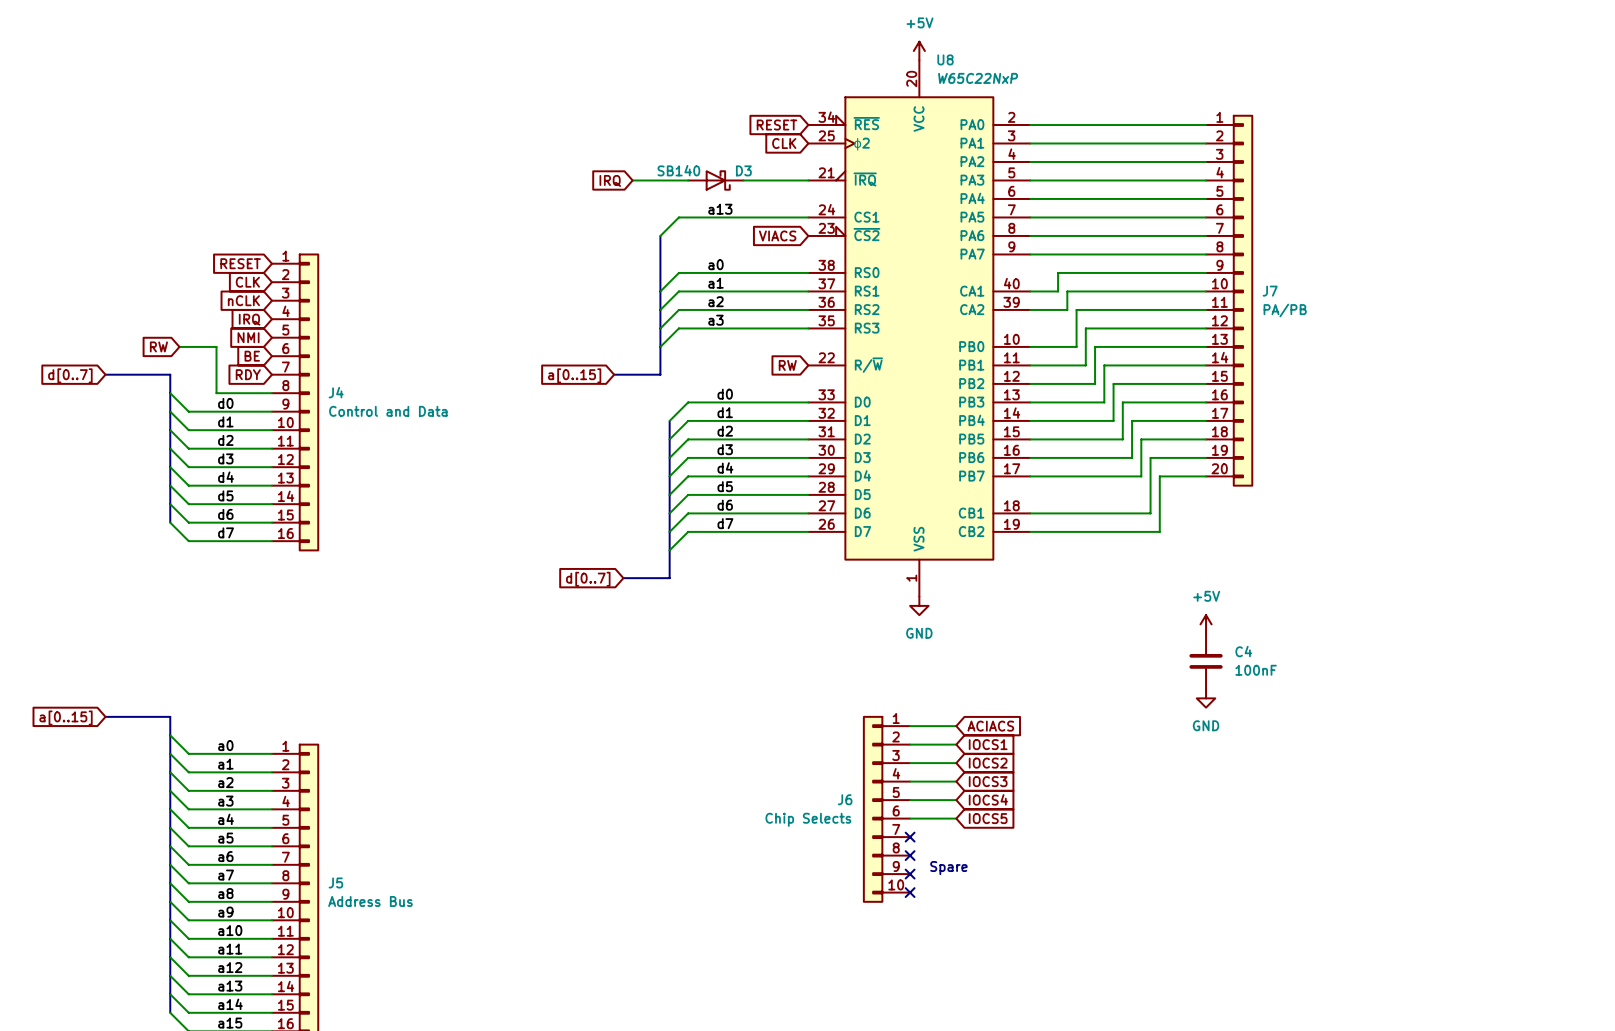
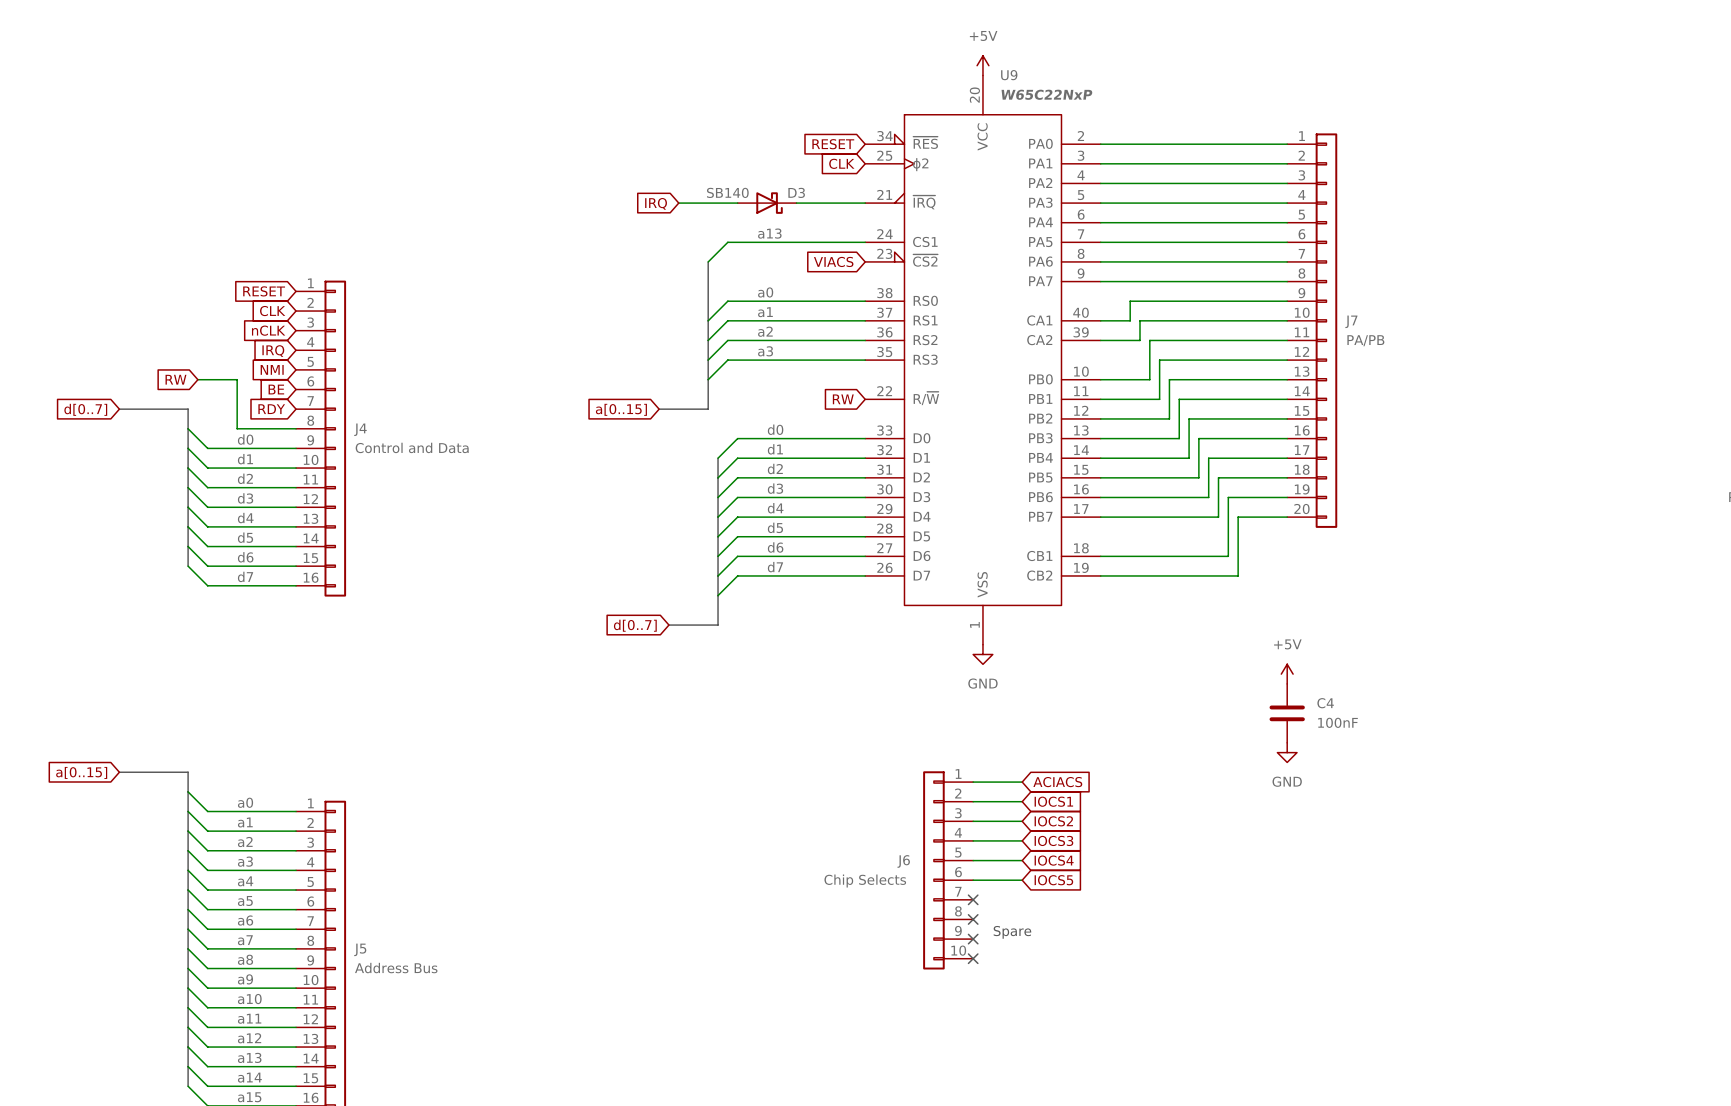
U8 name: U8 (945, 59) -> U9 (1009, 75)

